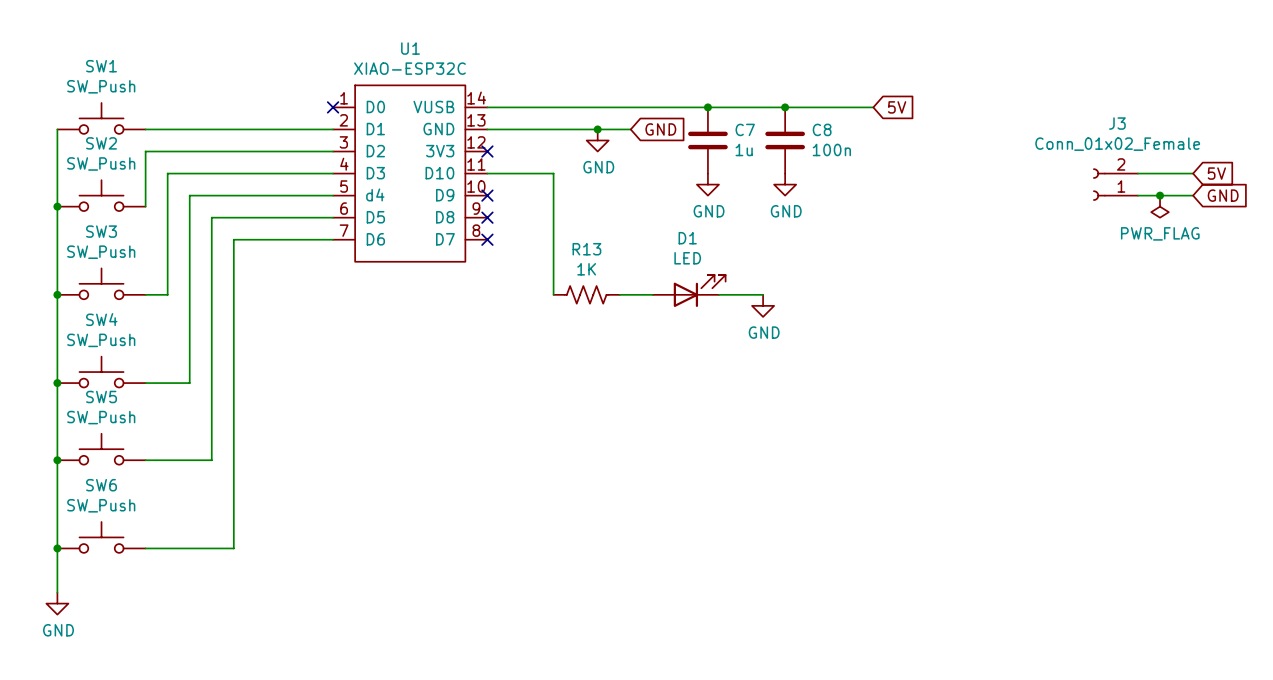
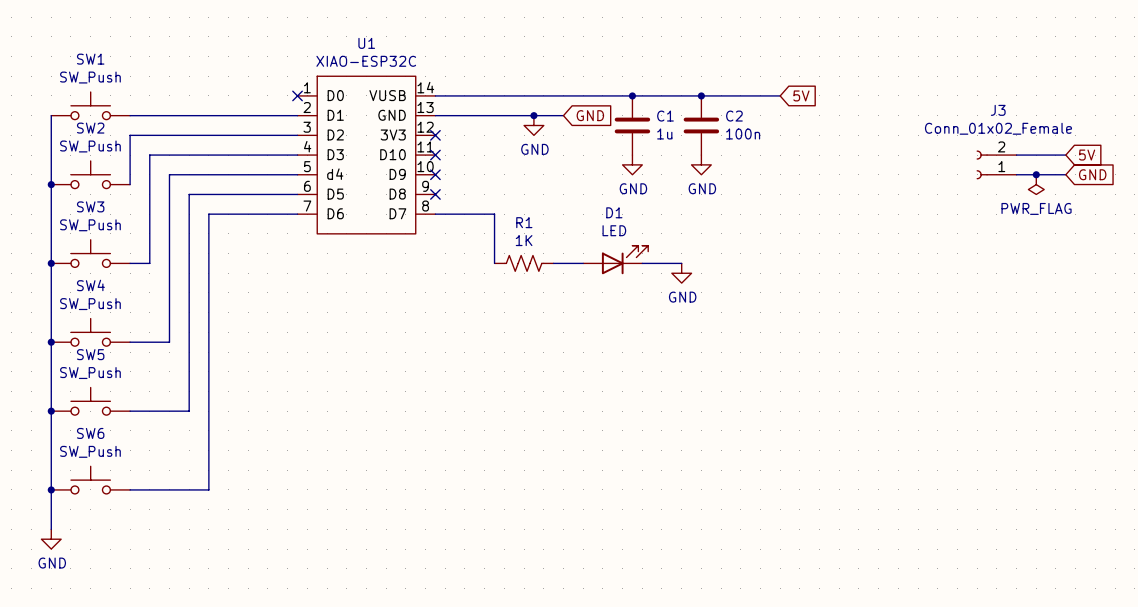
C7 name: C7 (745, 129) -> C1 (665, 116)
C8 name: C8 (822, 129) -> C2 (734, 116)
wire: (487, 173) (553, 173) (553, 239) -> (435, 214) (494, 214)
no-connect mark: none -> (435, 155)
no-connect mark: (487, 239) -> none
R13 name: R13 (586, 249) -> R1 (524, 222)

